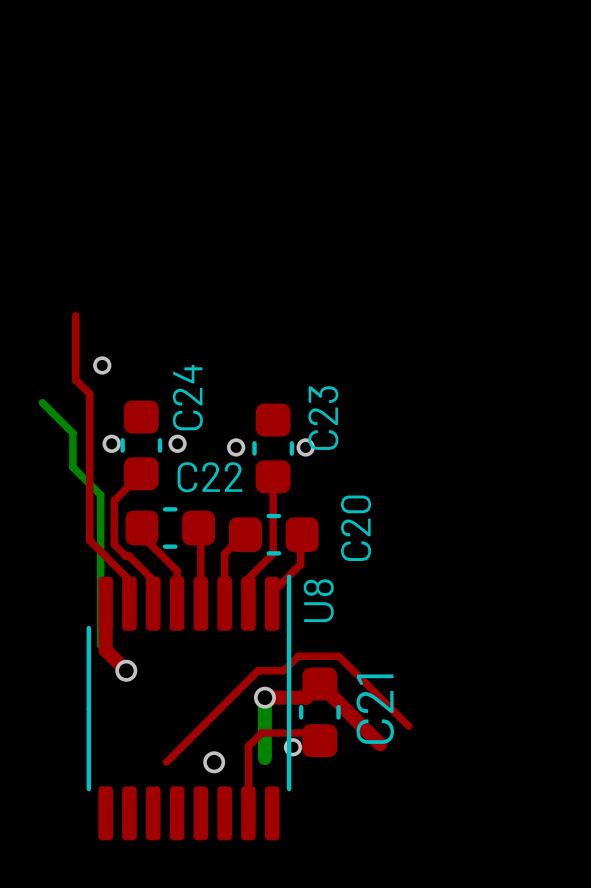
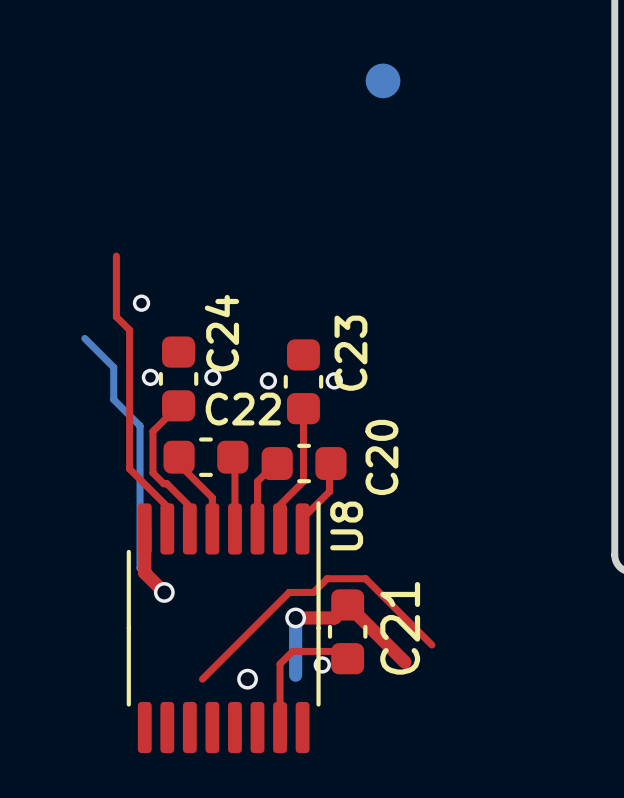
part: none -> (383, 80)

